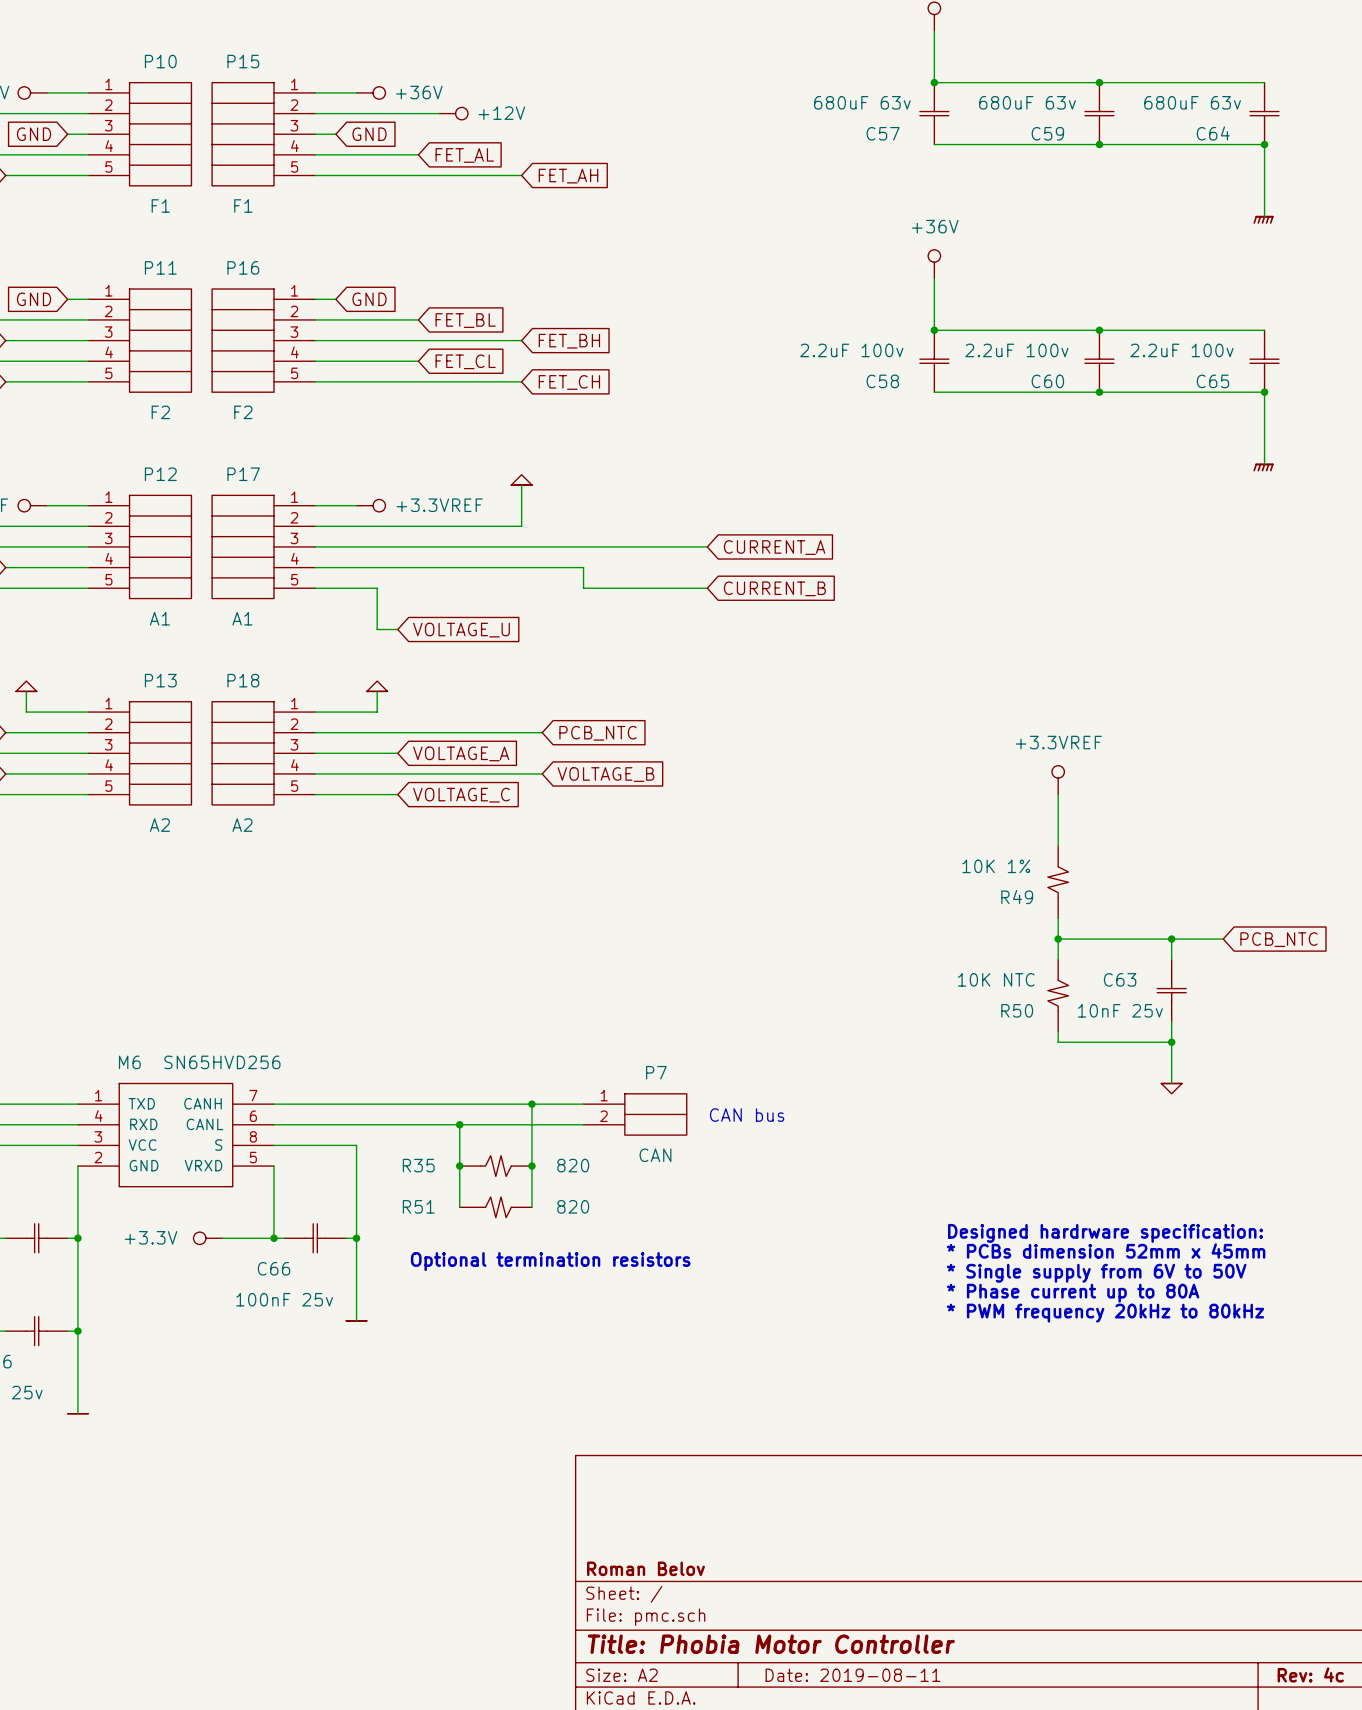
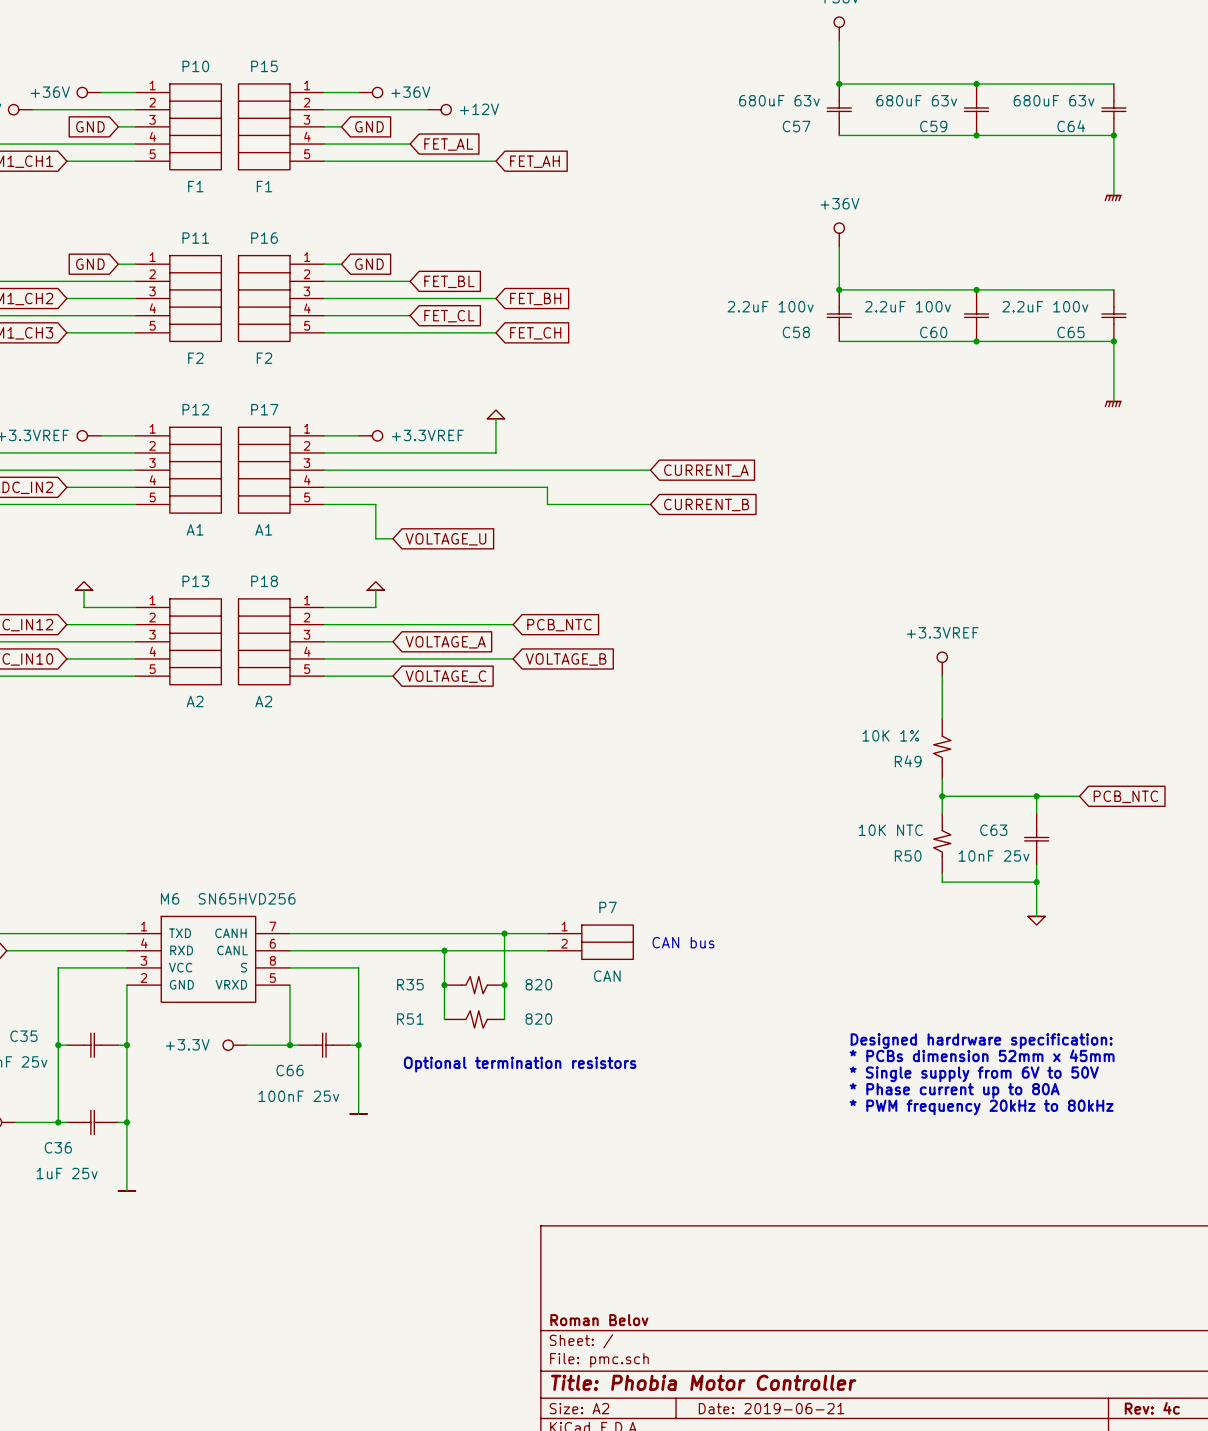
title block: Date: 2019-08-11 (852, 1675) -> Date: 2019-06-21 (771, 1408)

